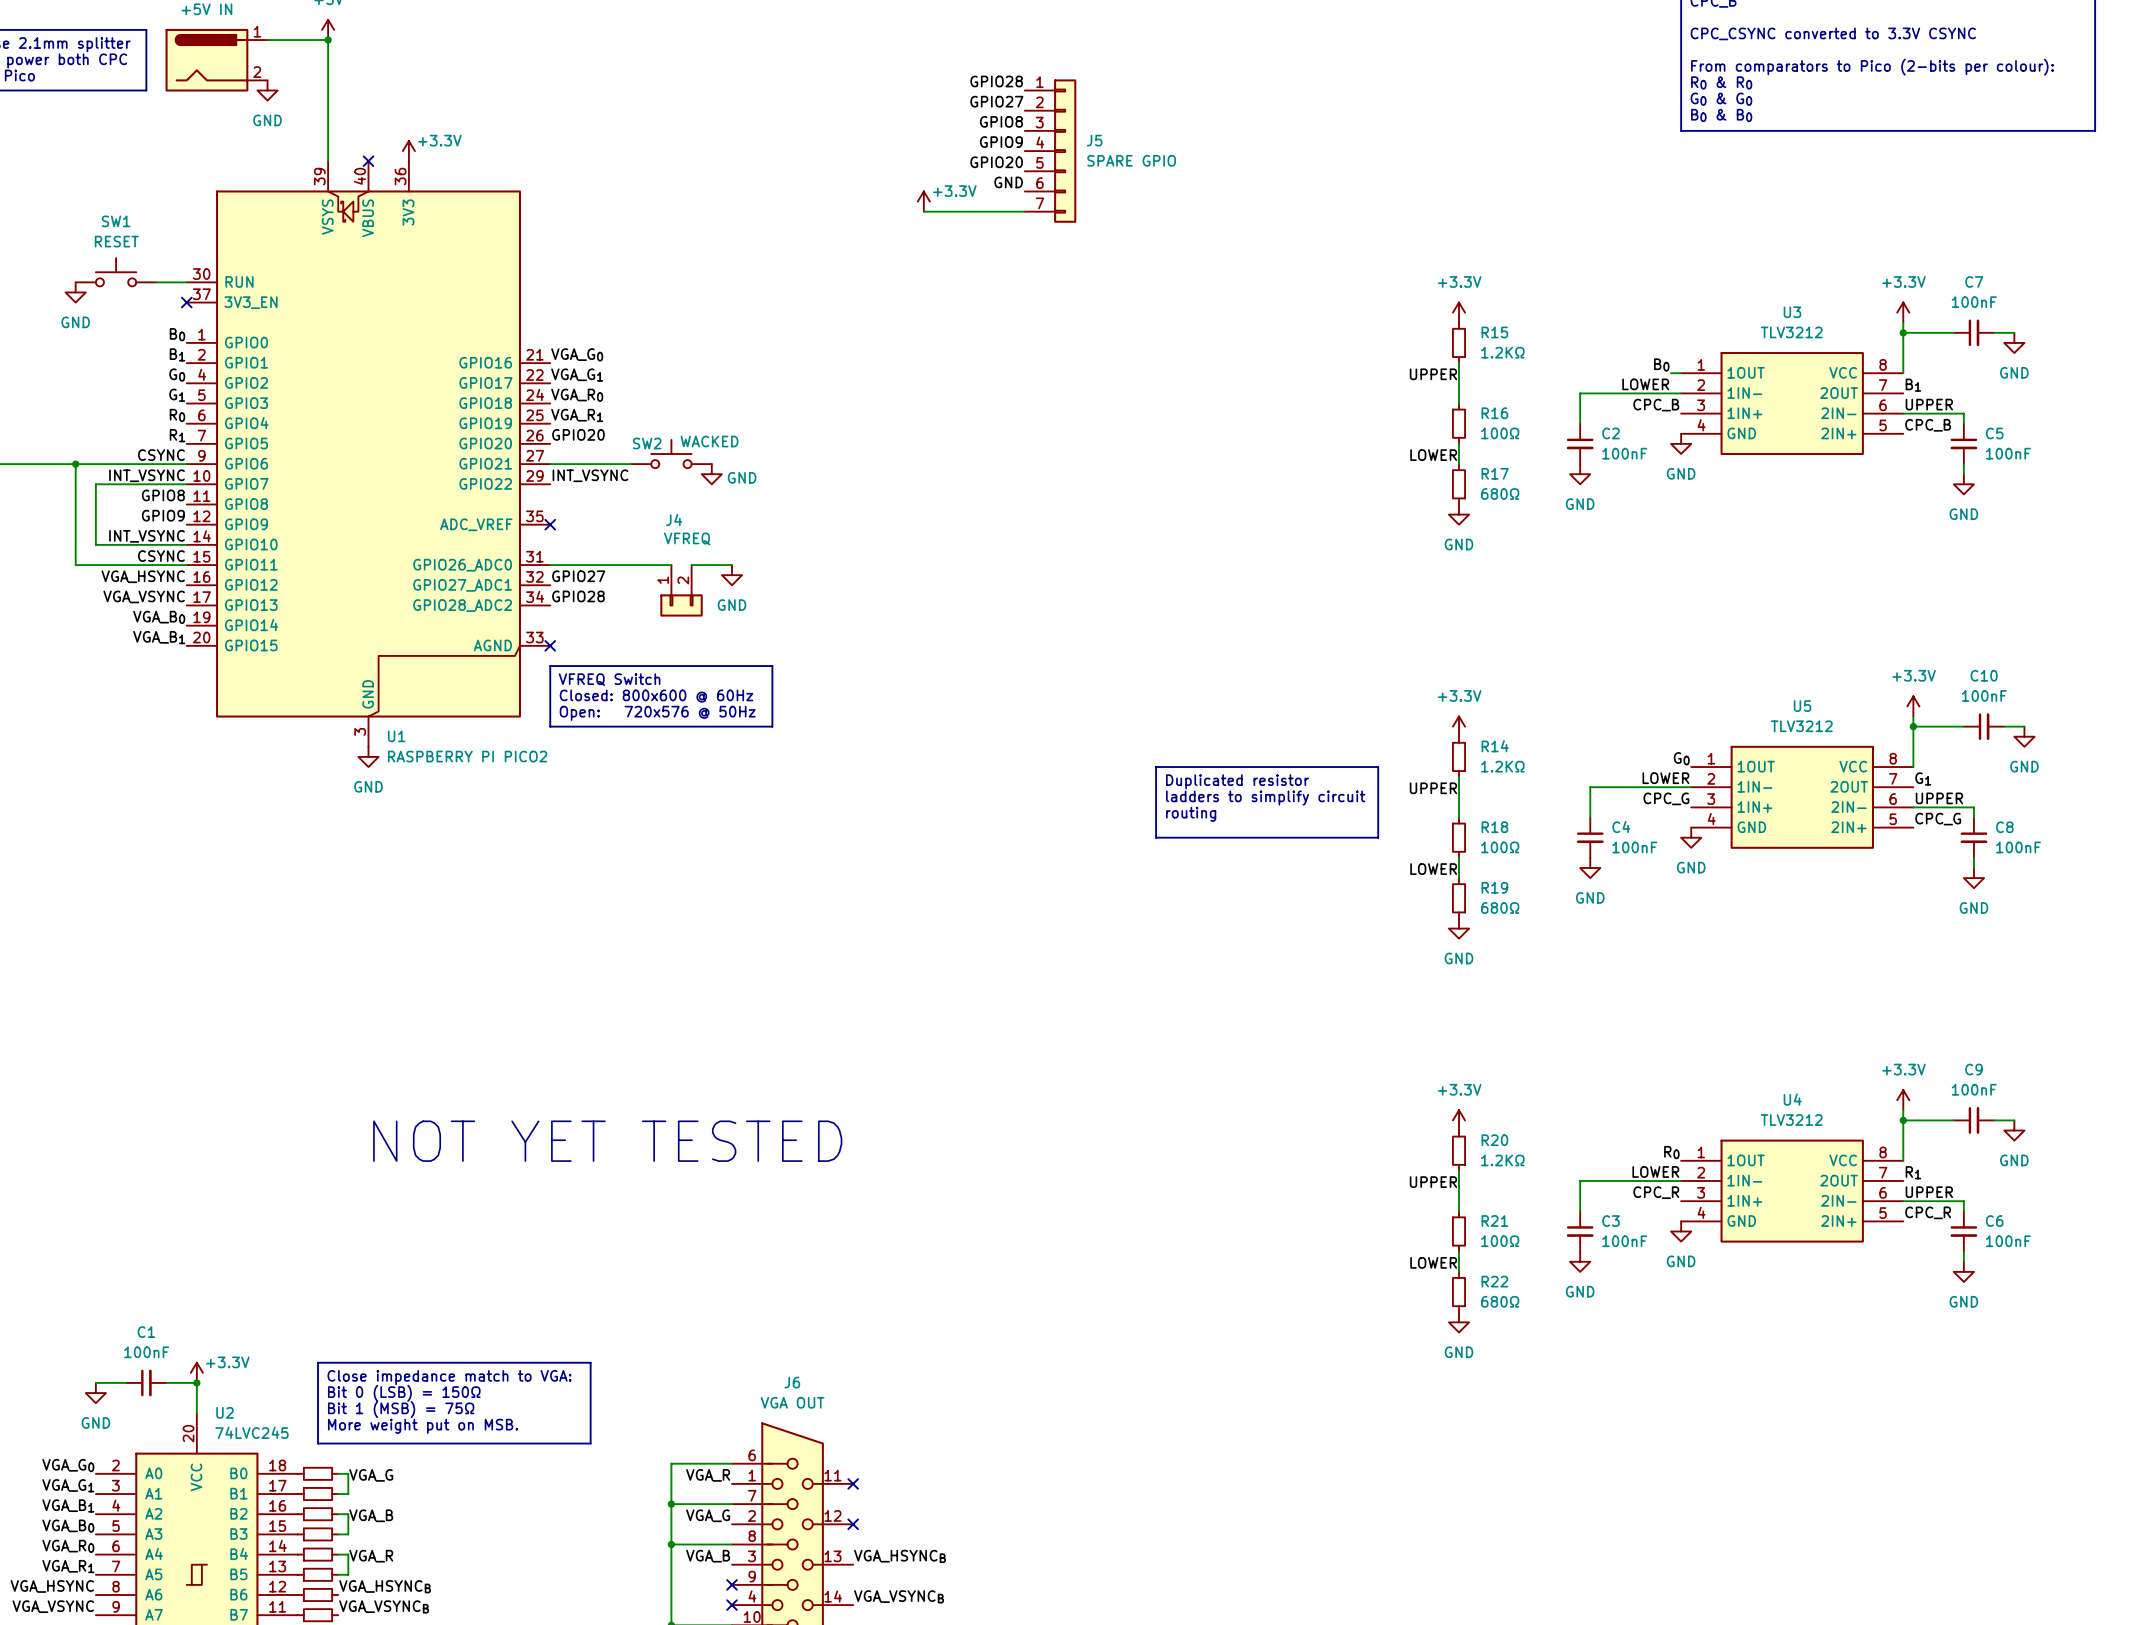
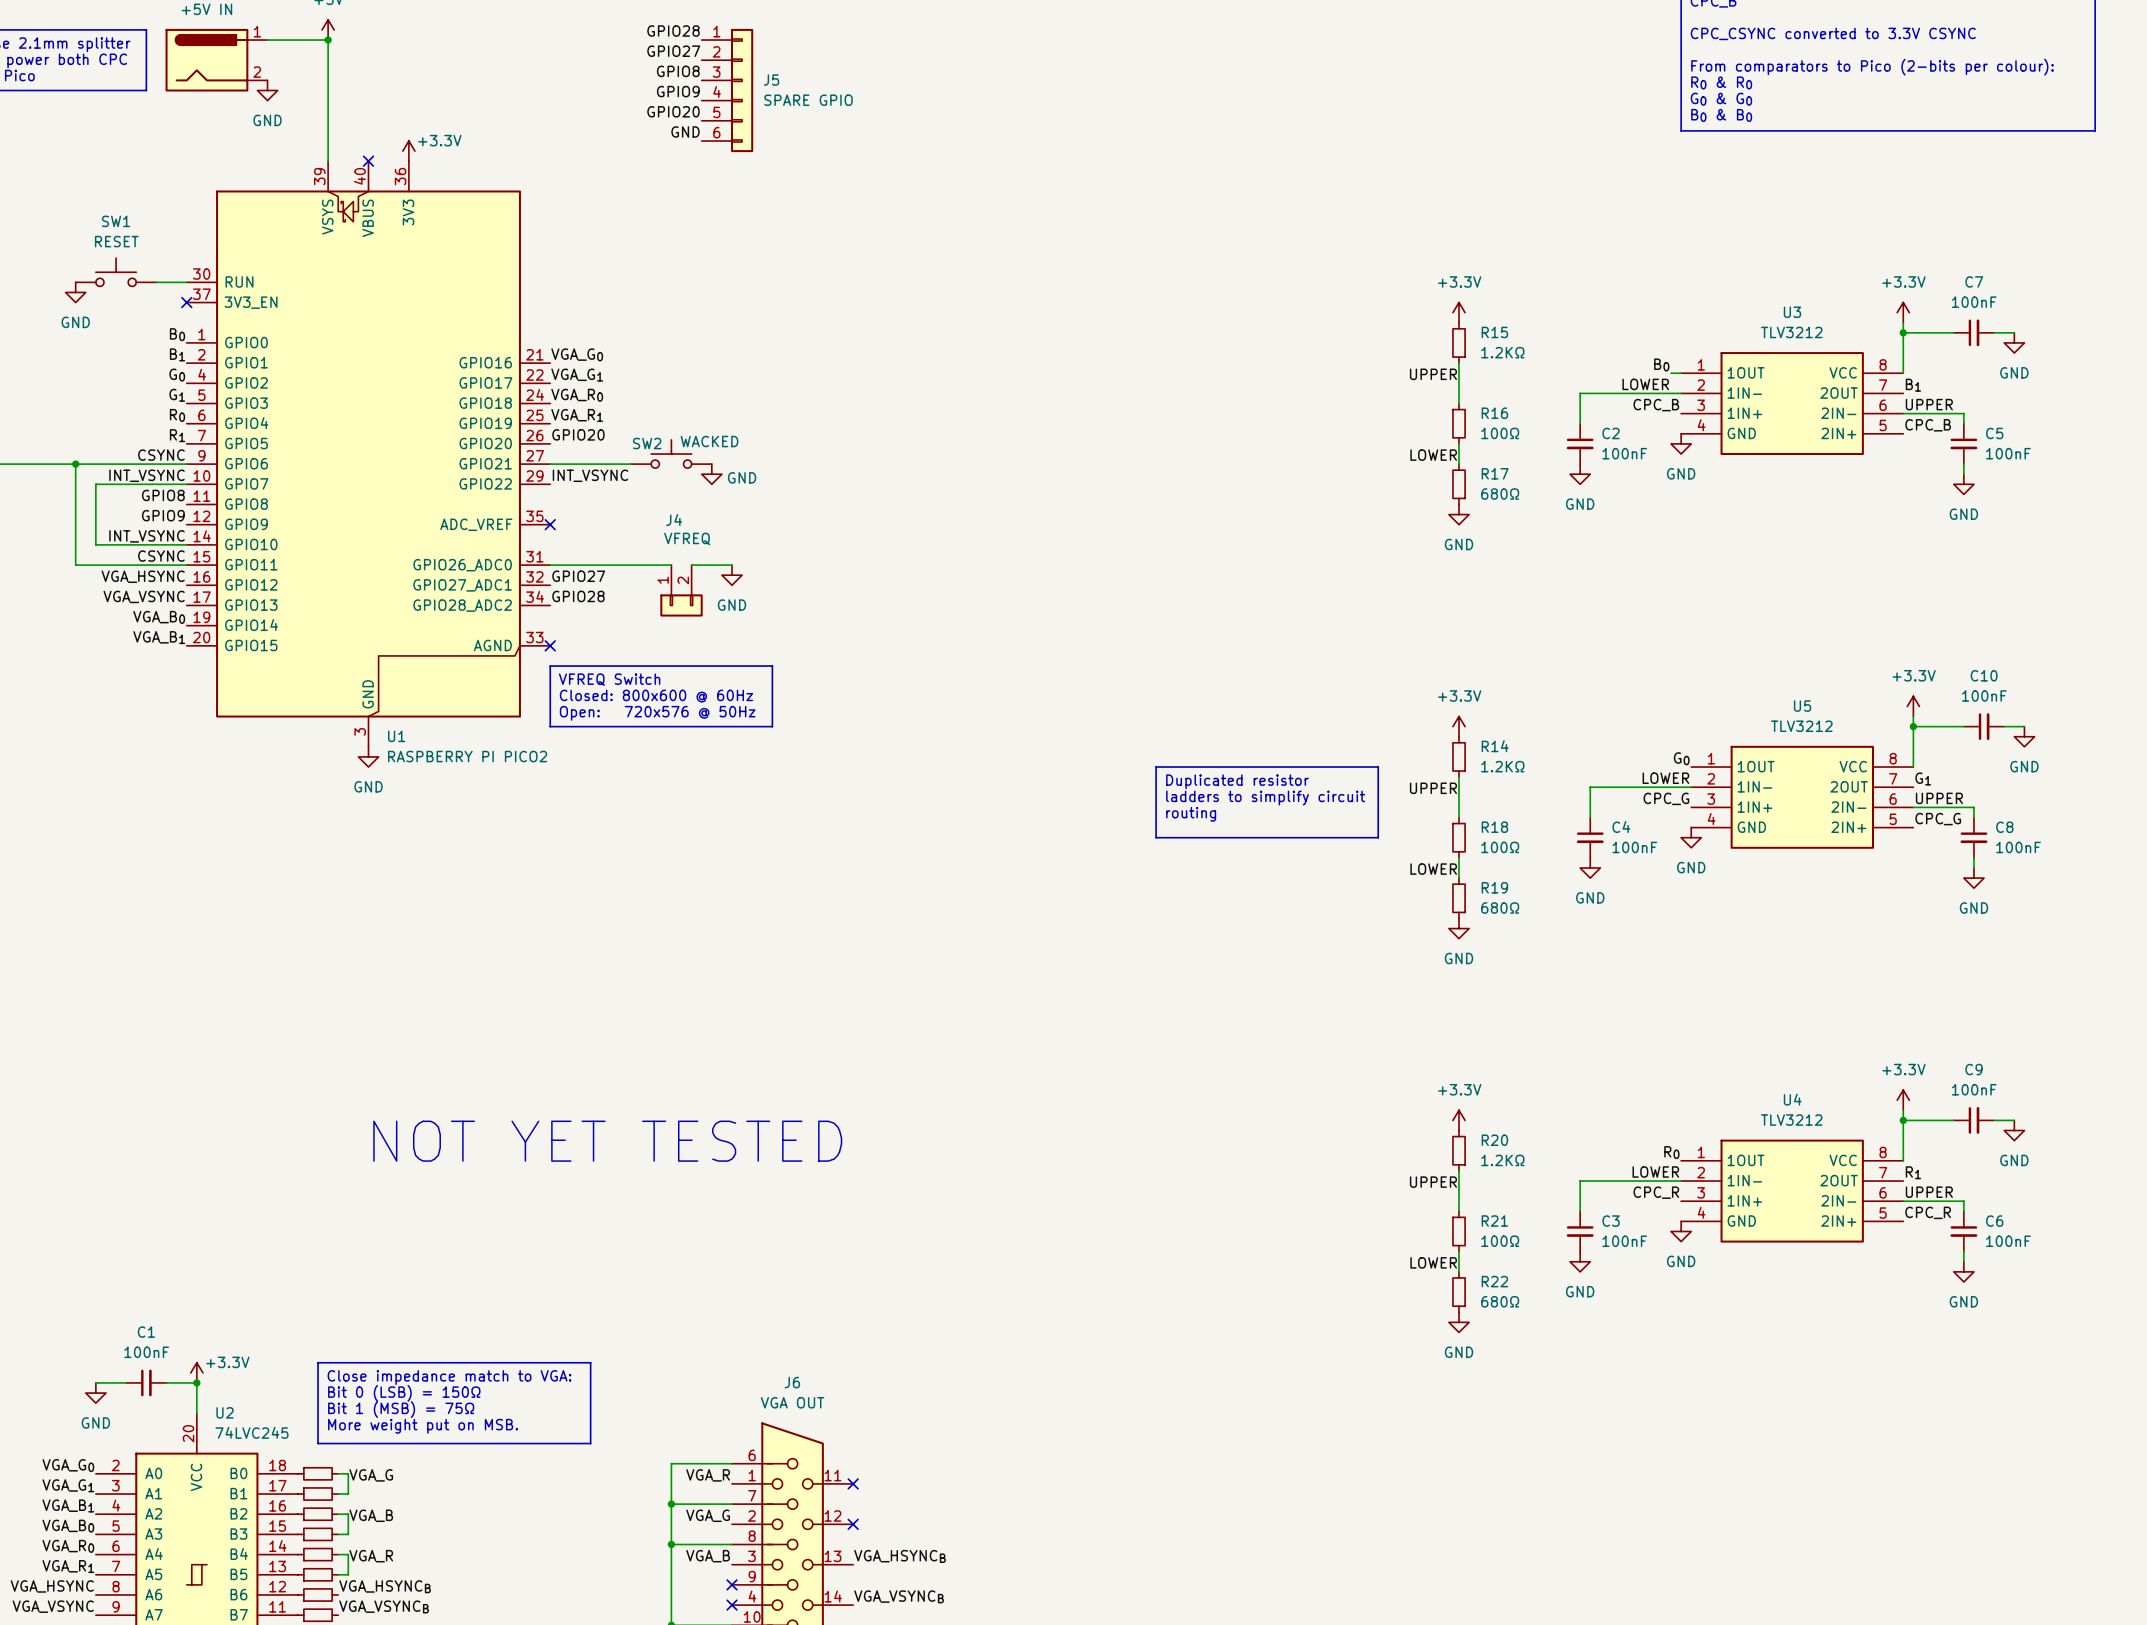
label: none -> GPIO28 (673, 31)
label: none -> GPIO27 (673, 51)
label: none -> GPIO8 (678, 71)
J5 symbol: [1024, 79, 1077, 223] -> [701, 28, 754, 153]
label: GPIO28 (996, 81) -> none
label: none -> GPIO9 (678, 91)
label: GPIO27 (996, 101) -> none
label: none -> GPIO20 (673, 111)
label: GPIO8 (1001, 121) -> none
label: none -> GND (685, 131)
label: GPIO9 (1001, 142) -> none
label: GPIO20 (996, 162) -> none
label: GND (1008, 182) -> none
power symbol: +3.3V (923, 201) -> none
wire: (923, 211) (1024, 211) -> none

